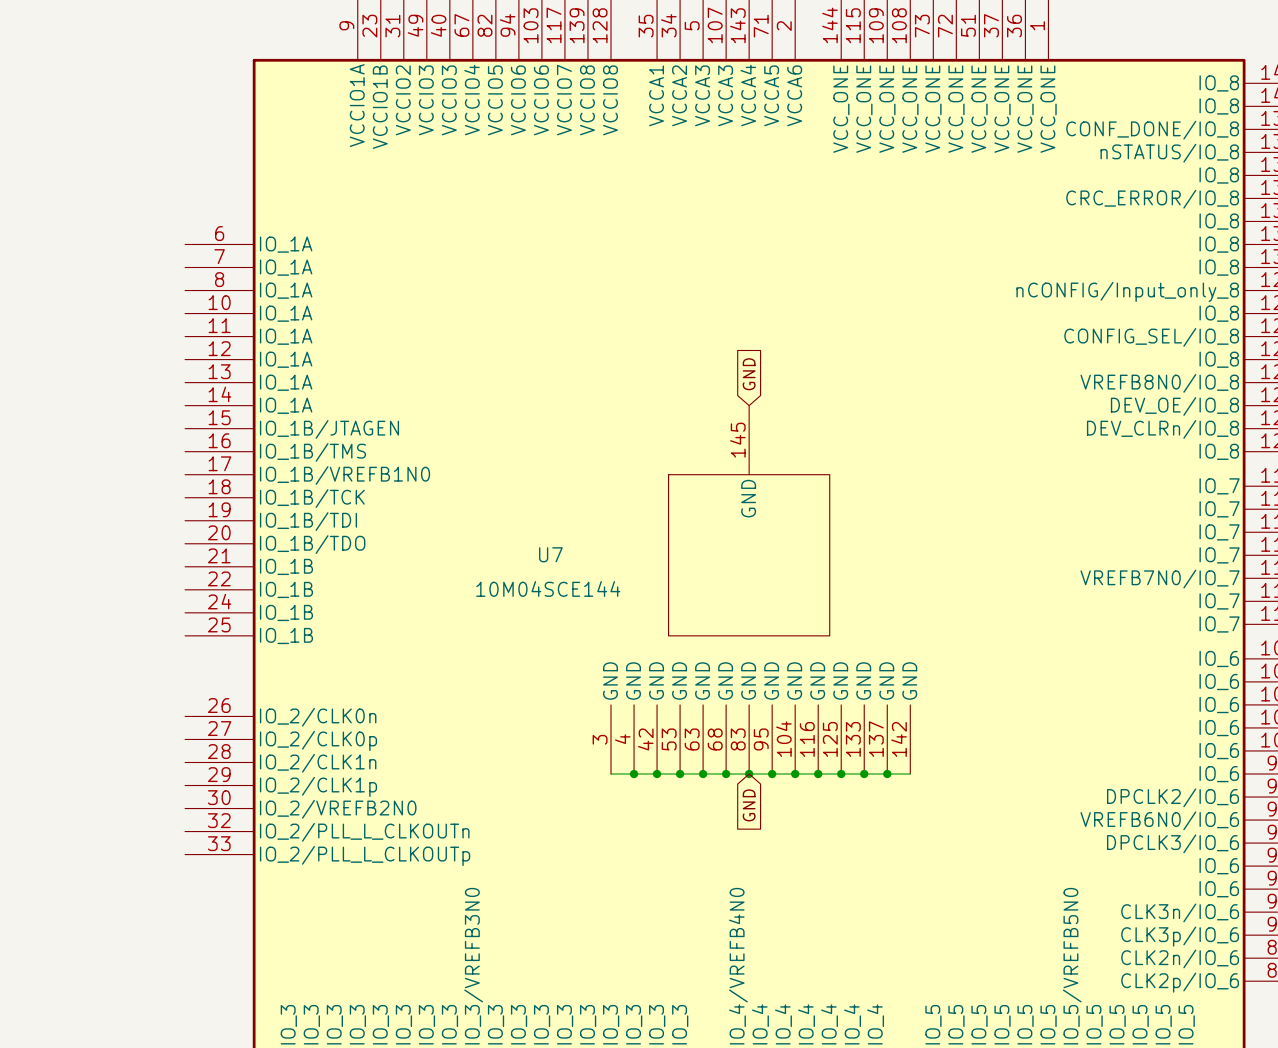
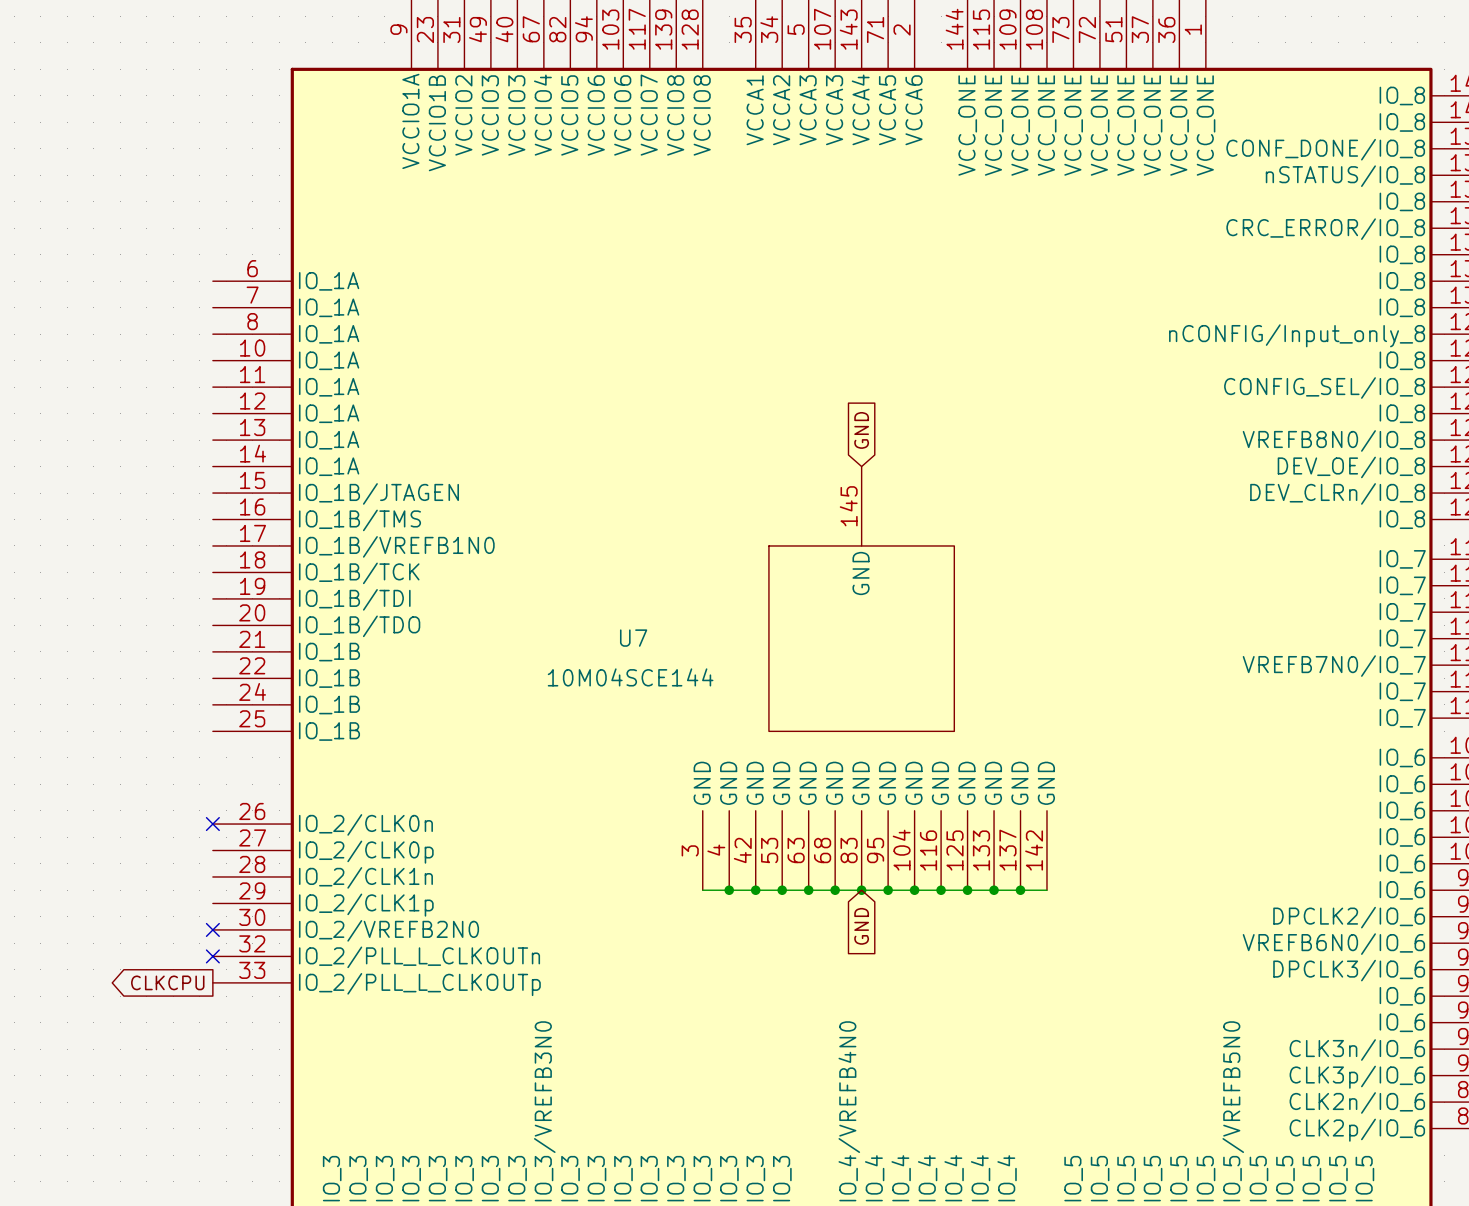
no-connect mark: none -> (212, 824)
no-connect mark: none -> (212, 929)
no-connect mark: none -> (212, 956)
global label: none -> CLKCPU (167, 982)

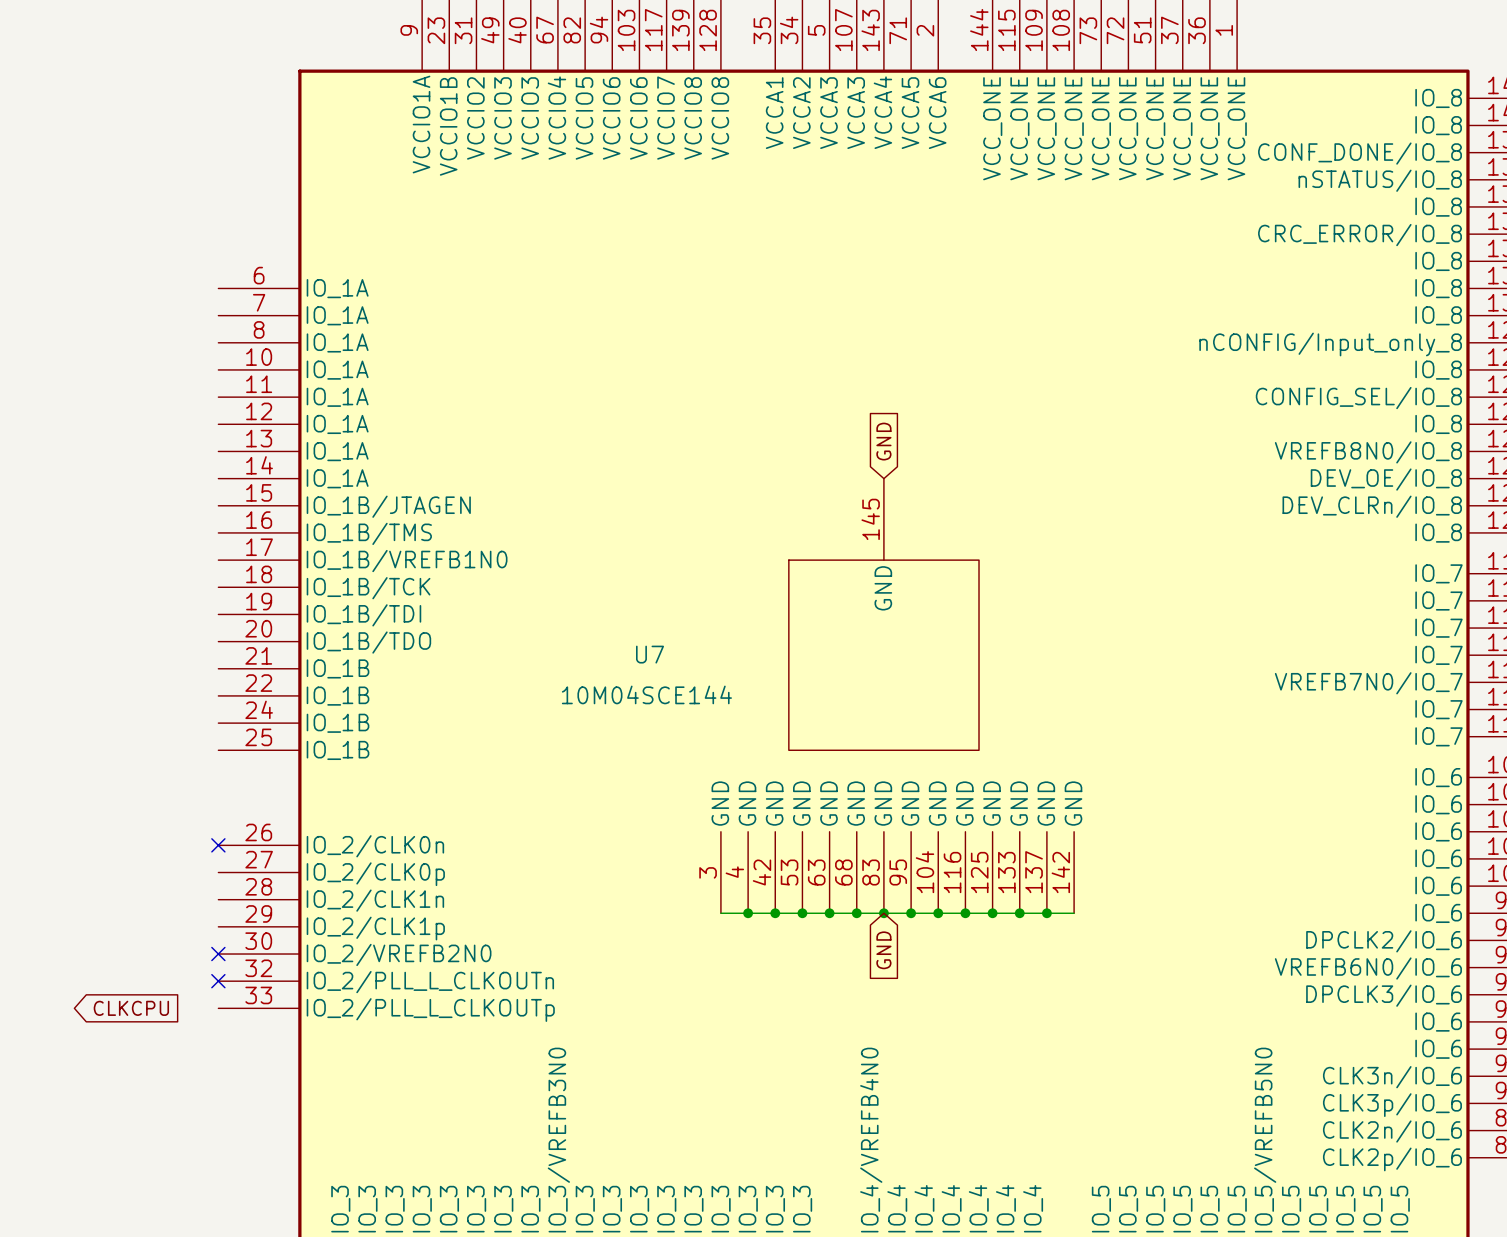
global label position: CLKCPU (167, 982) -> CLKCPU (131, 1008)

